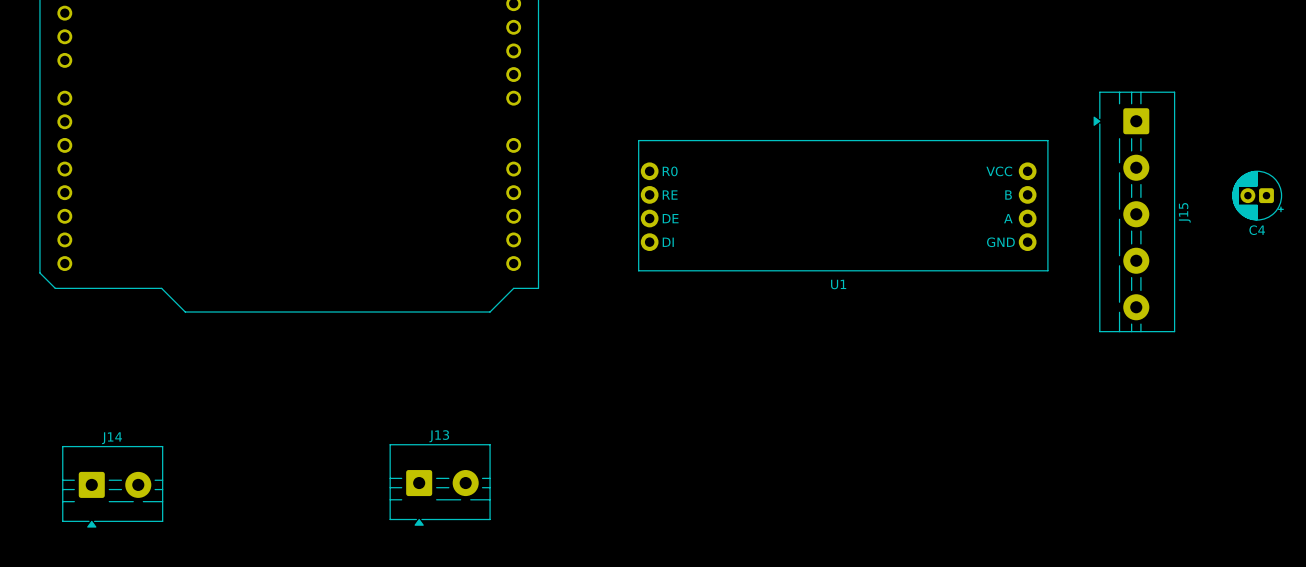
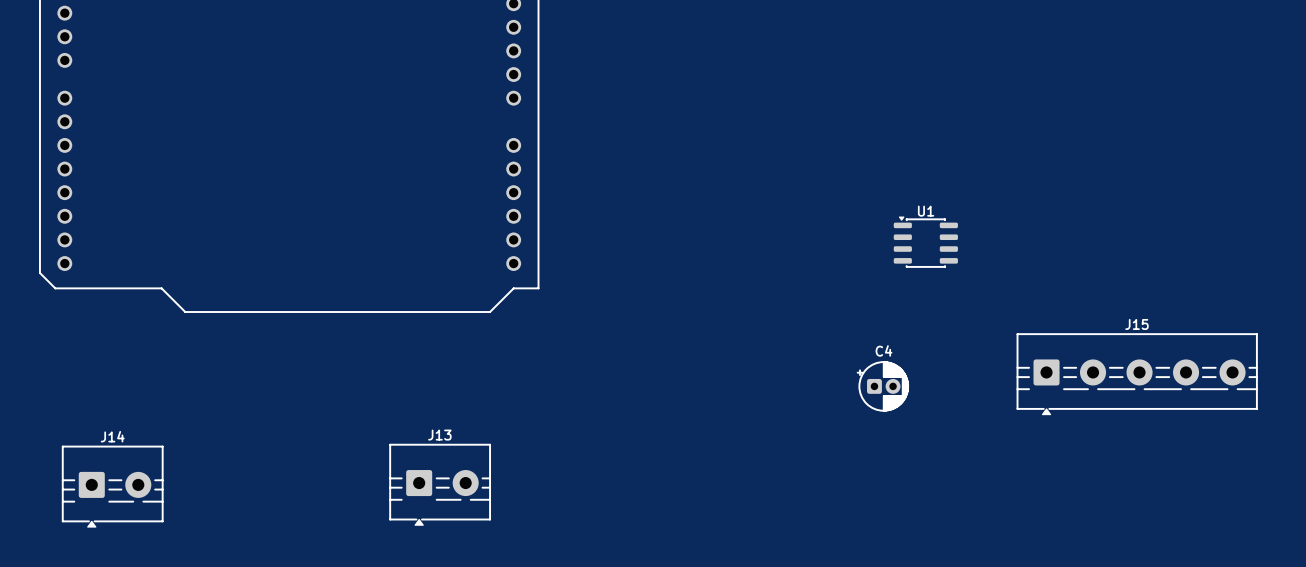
U1 footprint: [638, 140, 1049, 272] -> [893, 216, 958, 268]
C4 rotation: 0° (1258, 195) -> 180° (882, 386)
C4 position: (1258, 195) -> (882, 386)
J15 rotation: 0° (1134, 211) -> 90° counterclockwise (1137, 374)
J15 position: (1134, 211) -> (1137, 374)
U1 name position: U1 (838, 284) -> U1 (926, 211)

